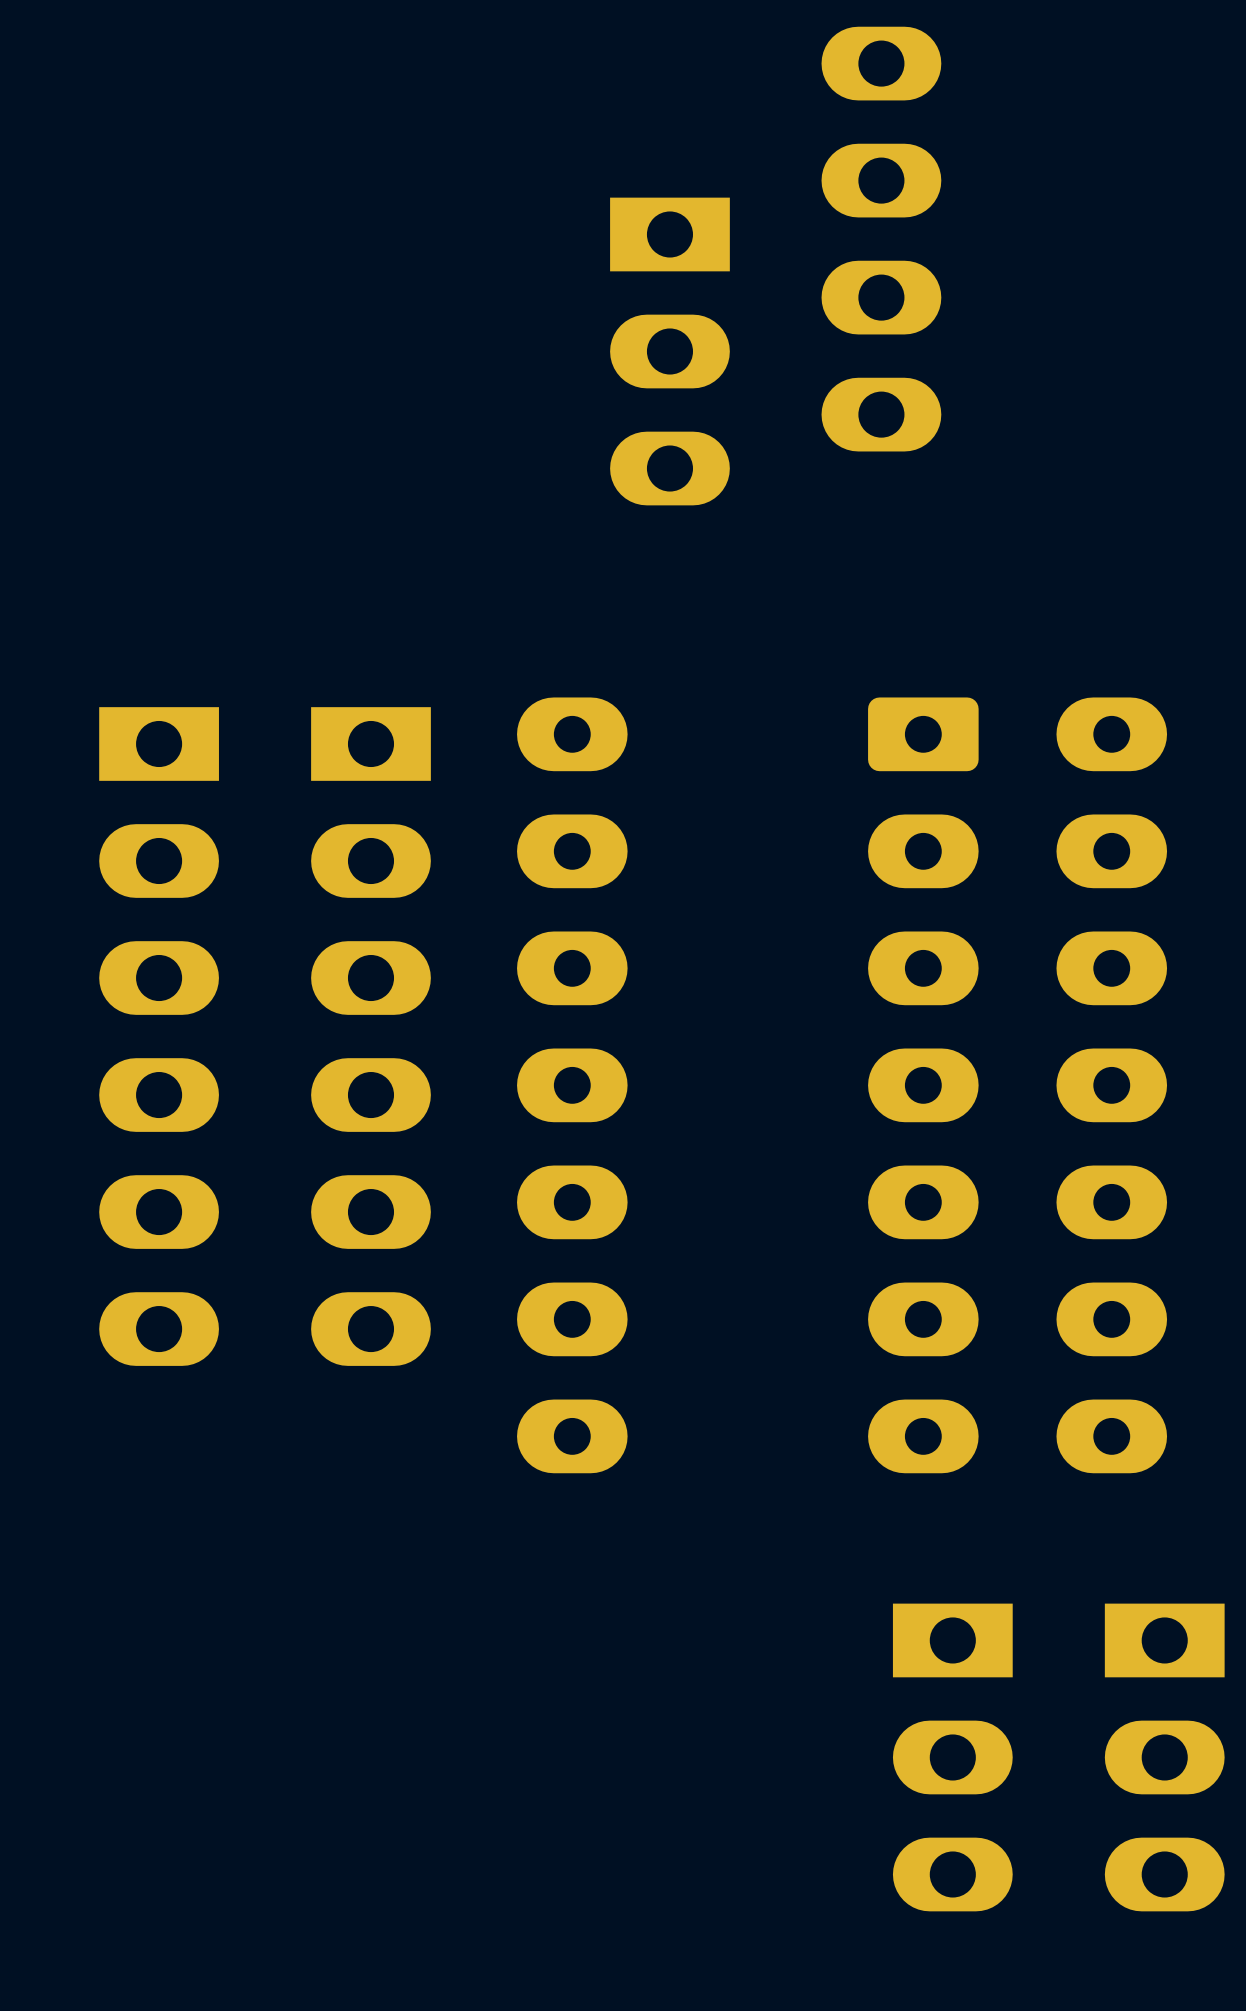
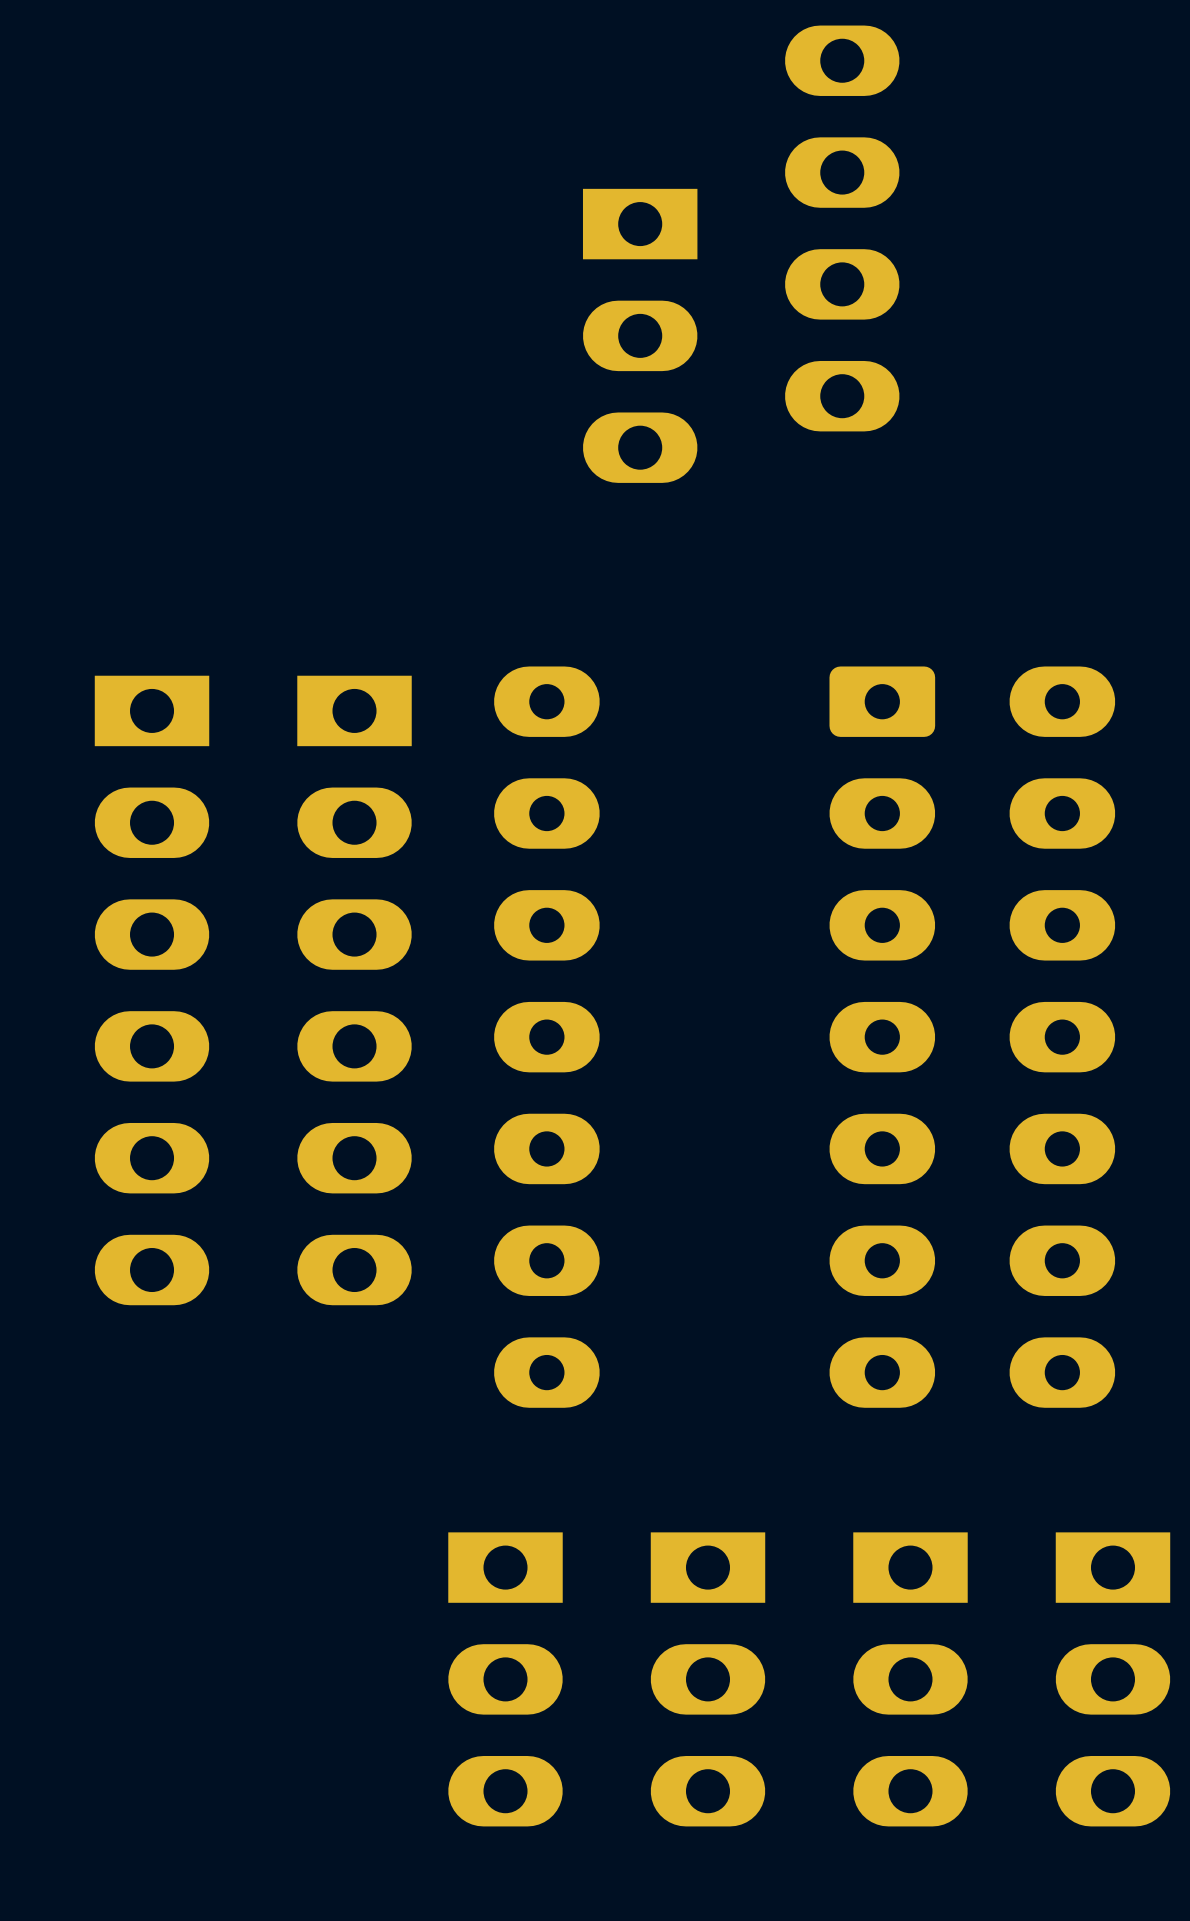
part: none -> (505, 1679)
part: none -> (708, 1679)

